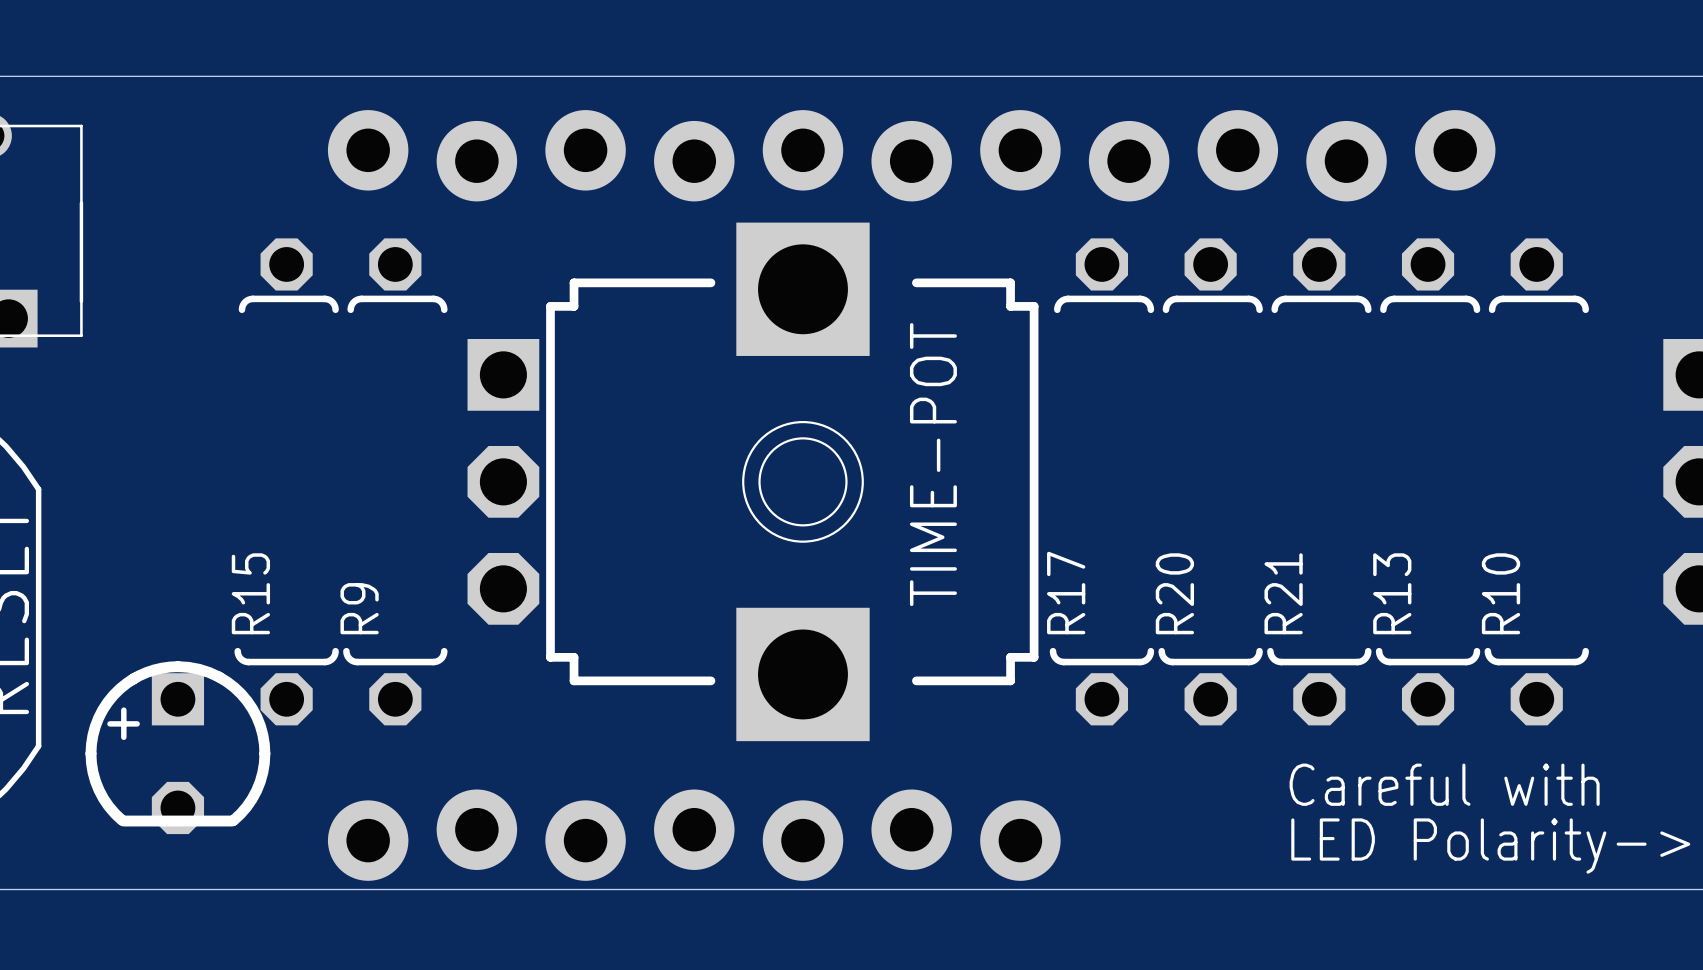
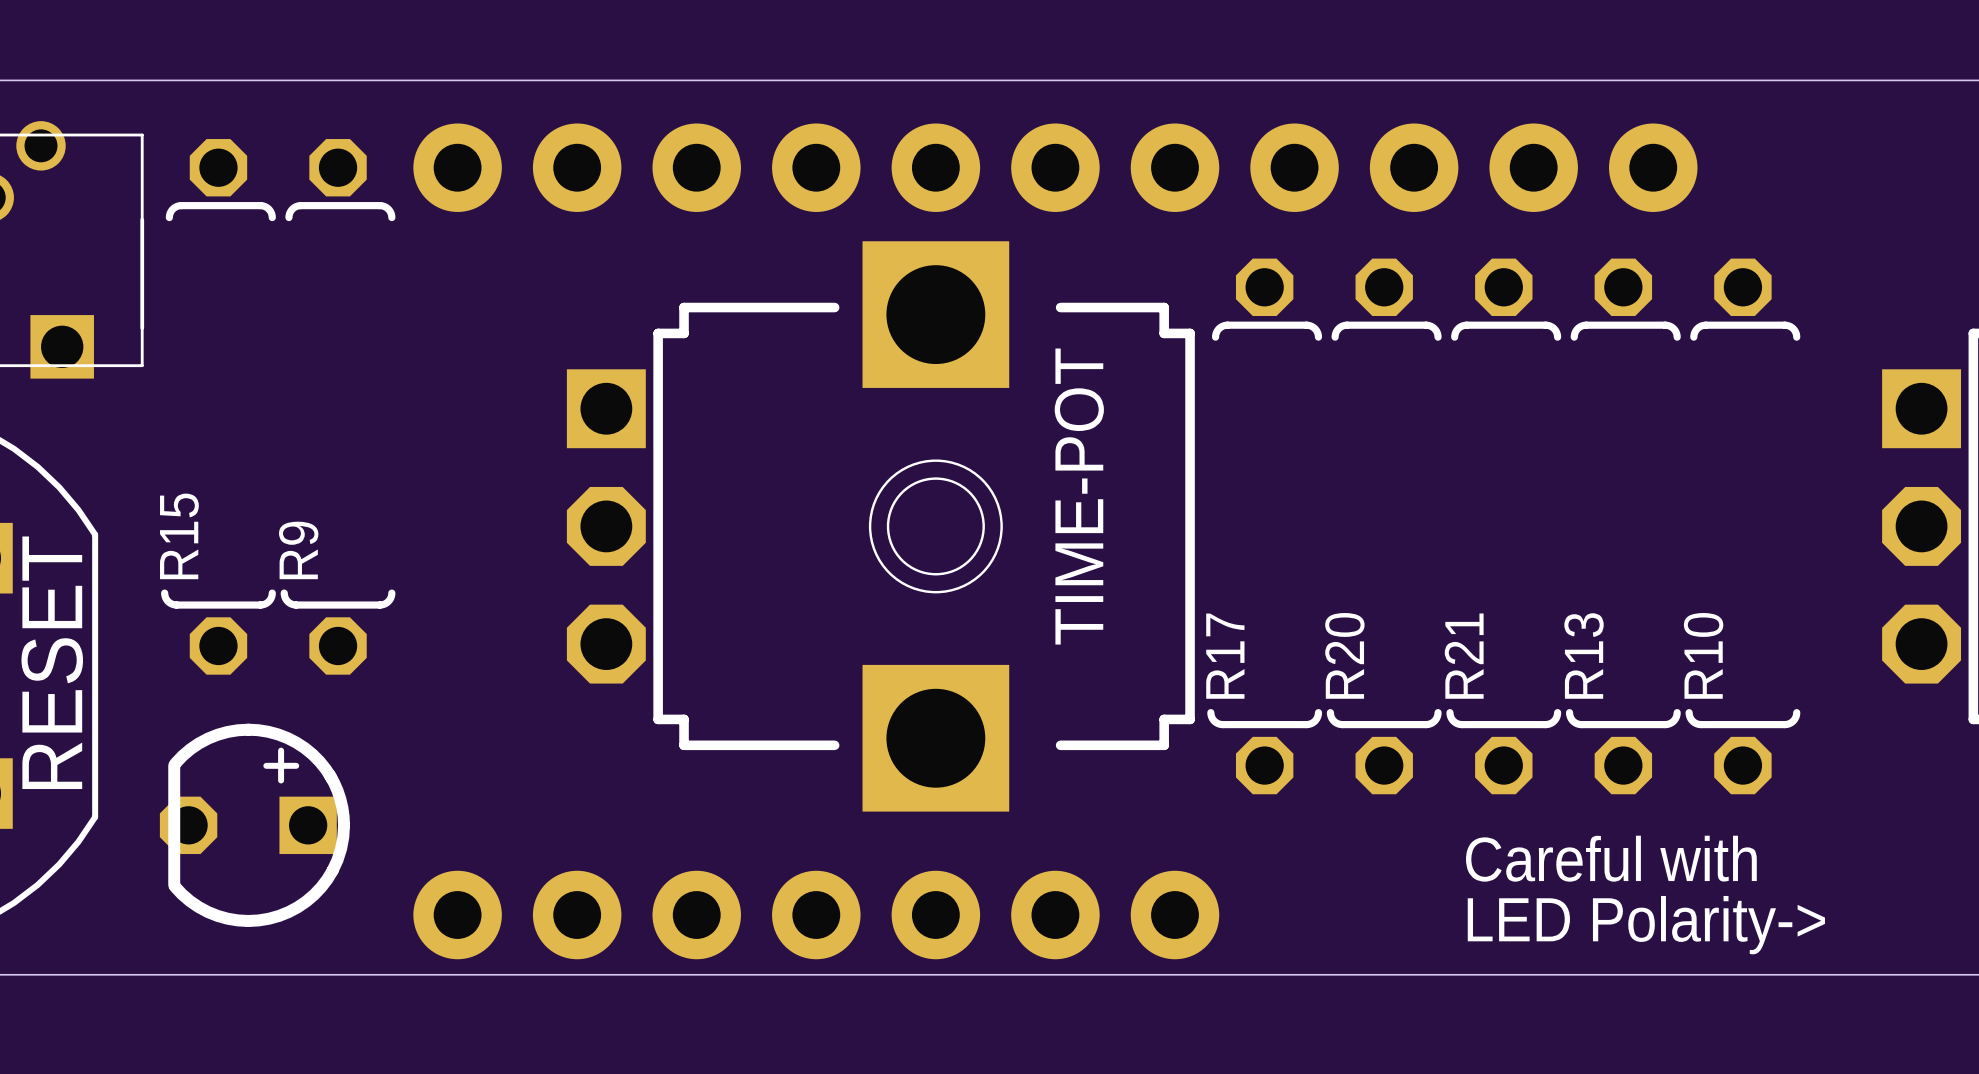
part footprint: [327, 110, 1496, 202] -> [413, 123, 1698, 212]
R15 position: (286, 481) -> (218, 406)
R9 position: (395, 481) -> (338, 406)
part rotation: 0° (177, 747) -> 90° clockwise (254, 825)
part footprint: [327, 789, 1061, 881] -> [413, 870, 1220, 960]

